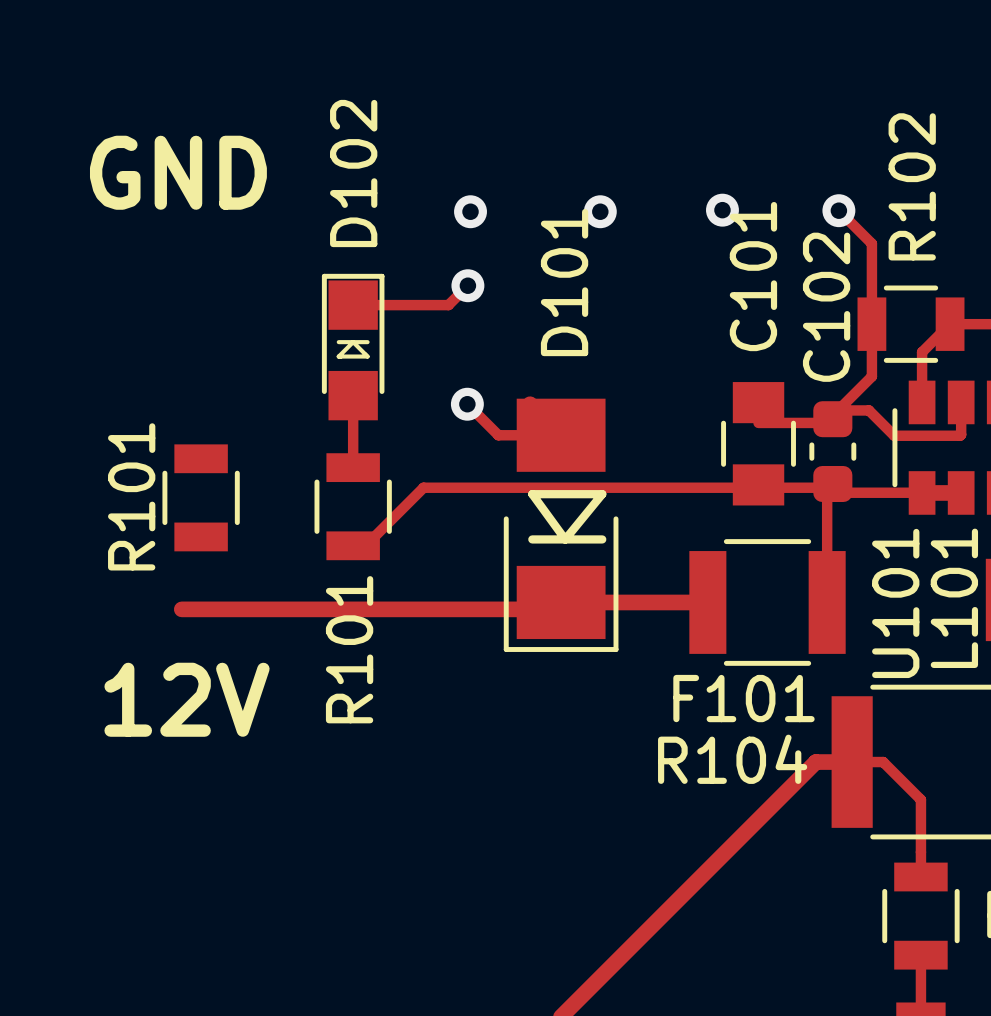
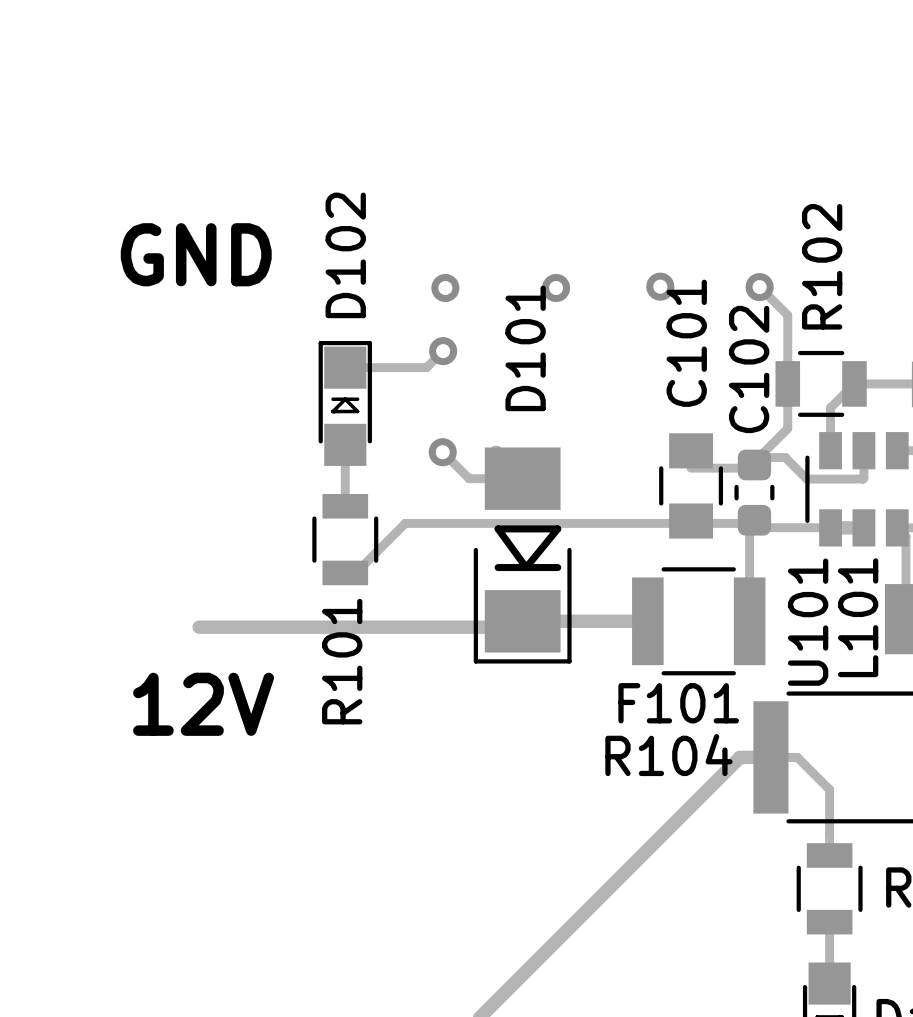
R101: (201, 497) -> none

